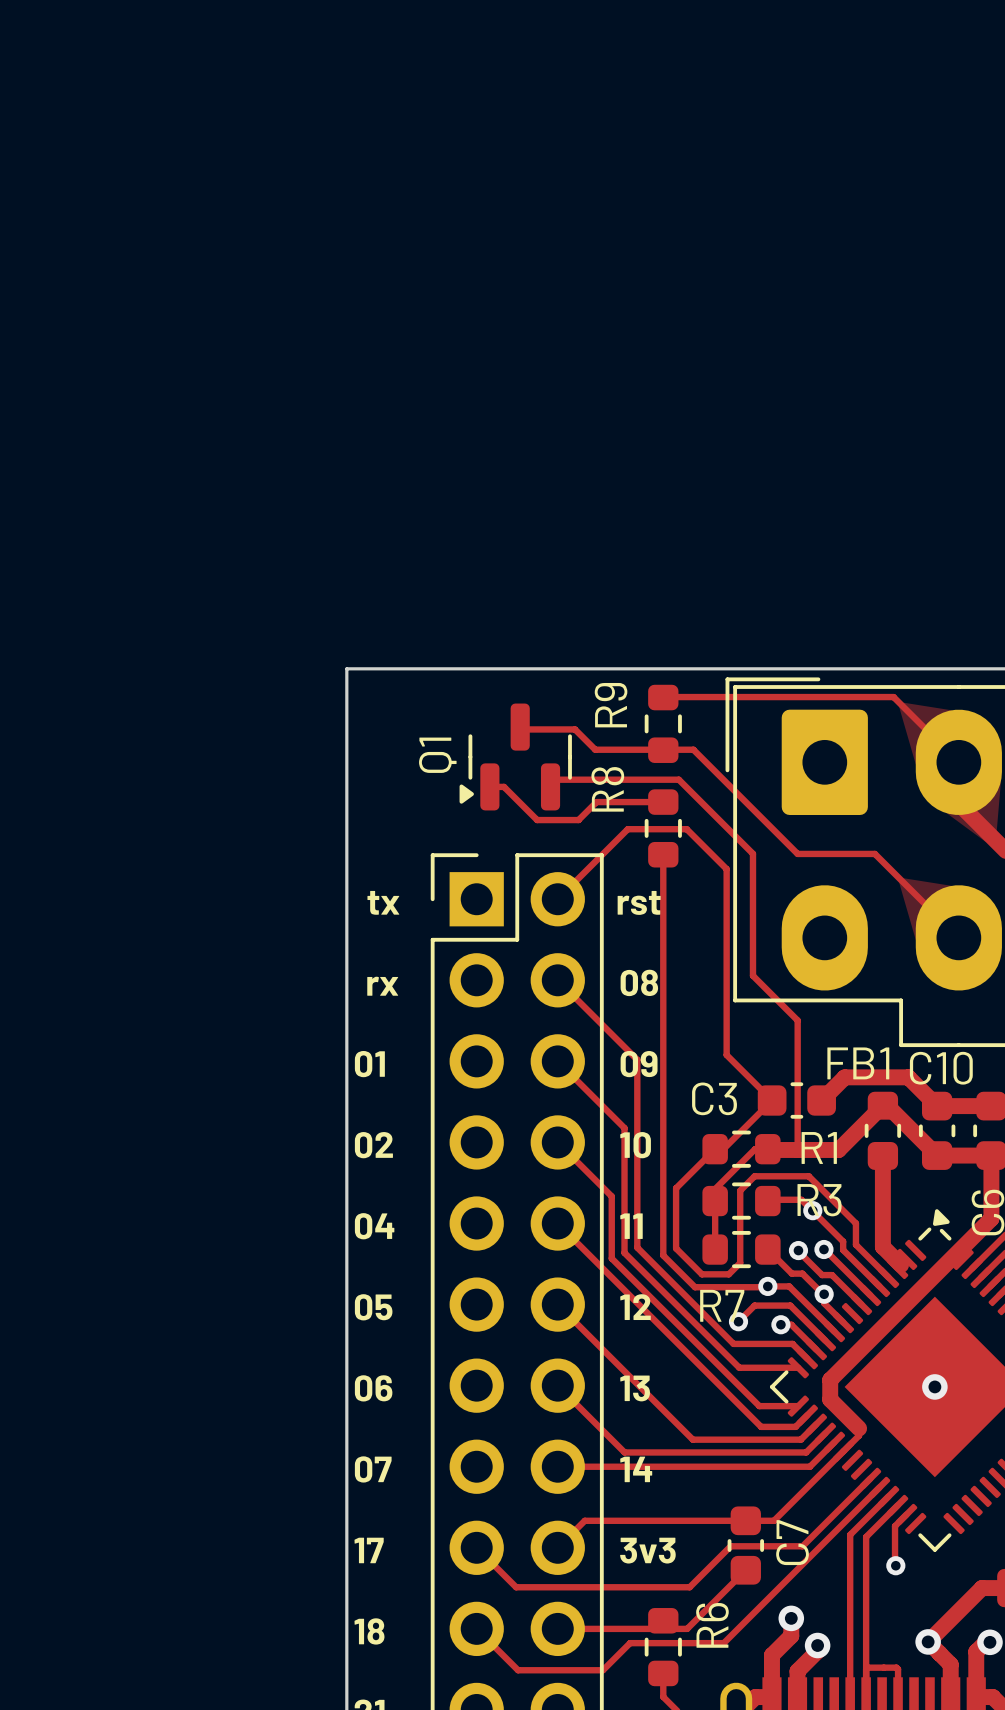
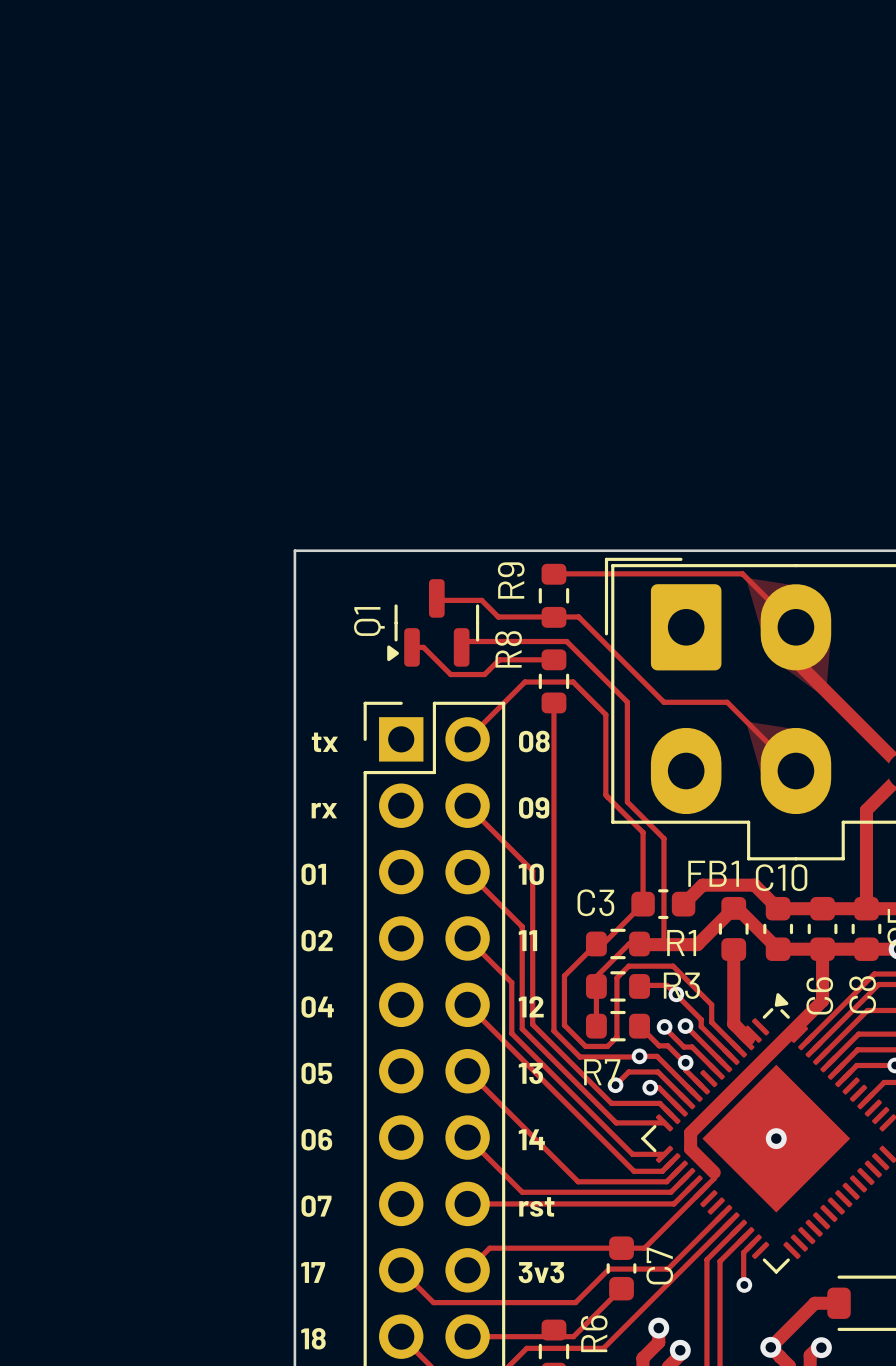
text: rst (639, 902) -> 08 (534, 741)
track: (726, 967) (726, 1055) (772, 1100) -> (605, 795) (643, 832) (643, 904)
text: 08 (639, 982) -> 09 (534, 807)
text: 09 (639, 1064) -> 10 (531, 874)
text: 10 (635, 1145) -> 11 (527, 940)
text: 11 (631, 1226) -> 12 (531, 1006)
text: 12 (635, 1307) -> 13 (530, 1073)
text: 13 (635, 1388) -> 14 (531, 1139)
text: 14 (636, 1469) -> rst (536, 1206)

